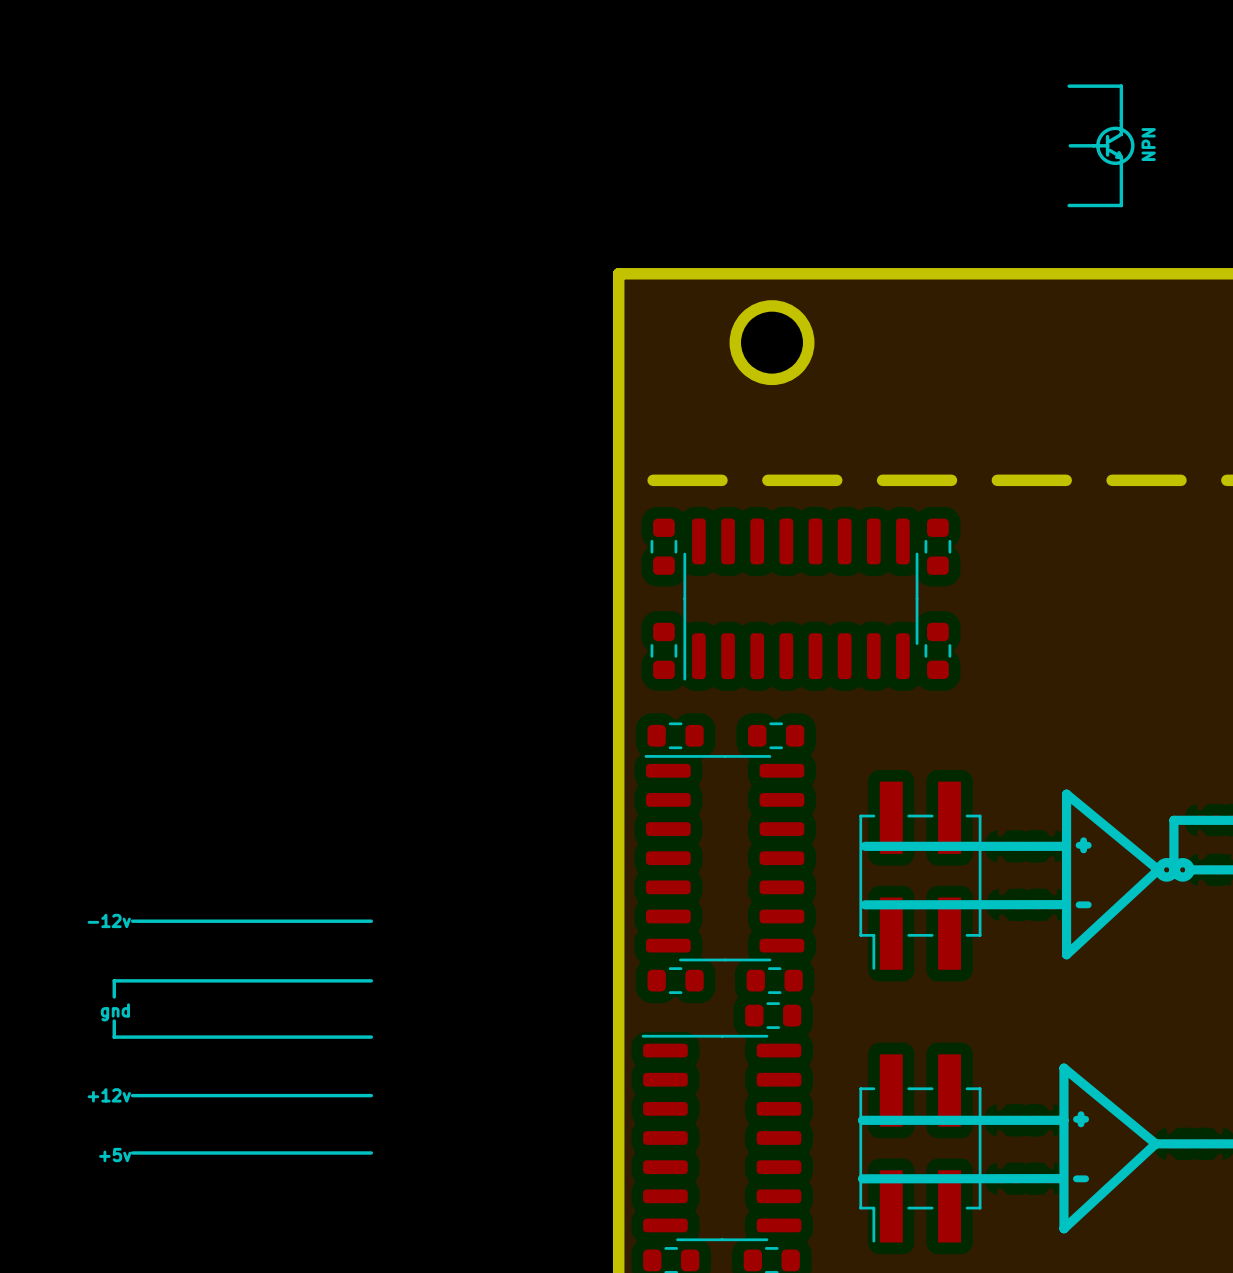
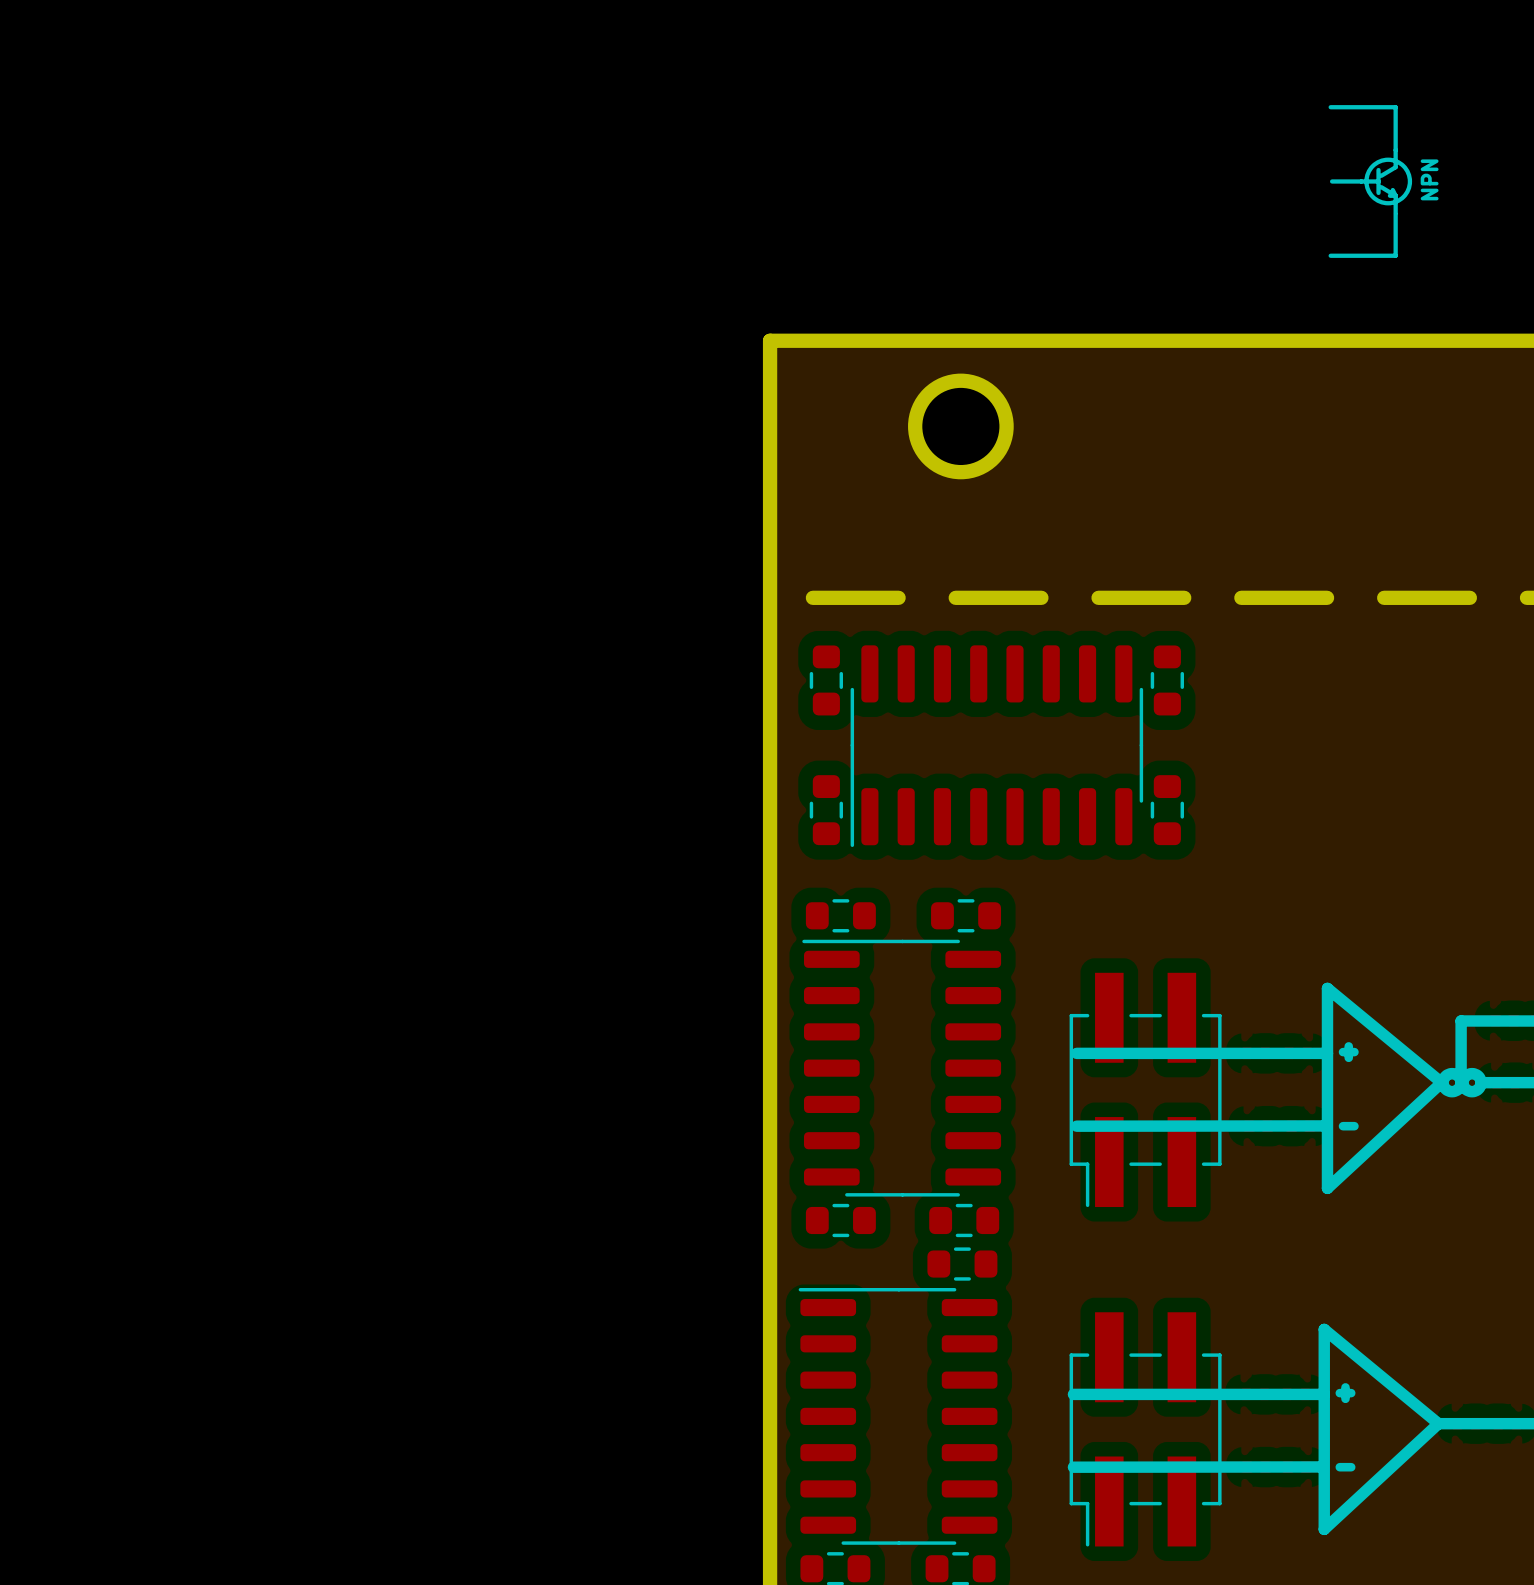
text: -12v (109, 920) -> none
line: (132, 921) (371, 921) -> none
line: (371, 980) (114, 980) (114, 996) -> none
text: gnd (115, 1012) -> none
line: (114, 1021) (114, 1037) (371, 1037) -> none
text: +12v (109, 1095) -> none
line: (132, 1095) (371, 1095) -> none
line: (132, 1152) (371, 1152) -> none
text: +5v (115, 1155) -> none

